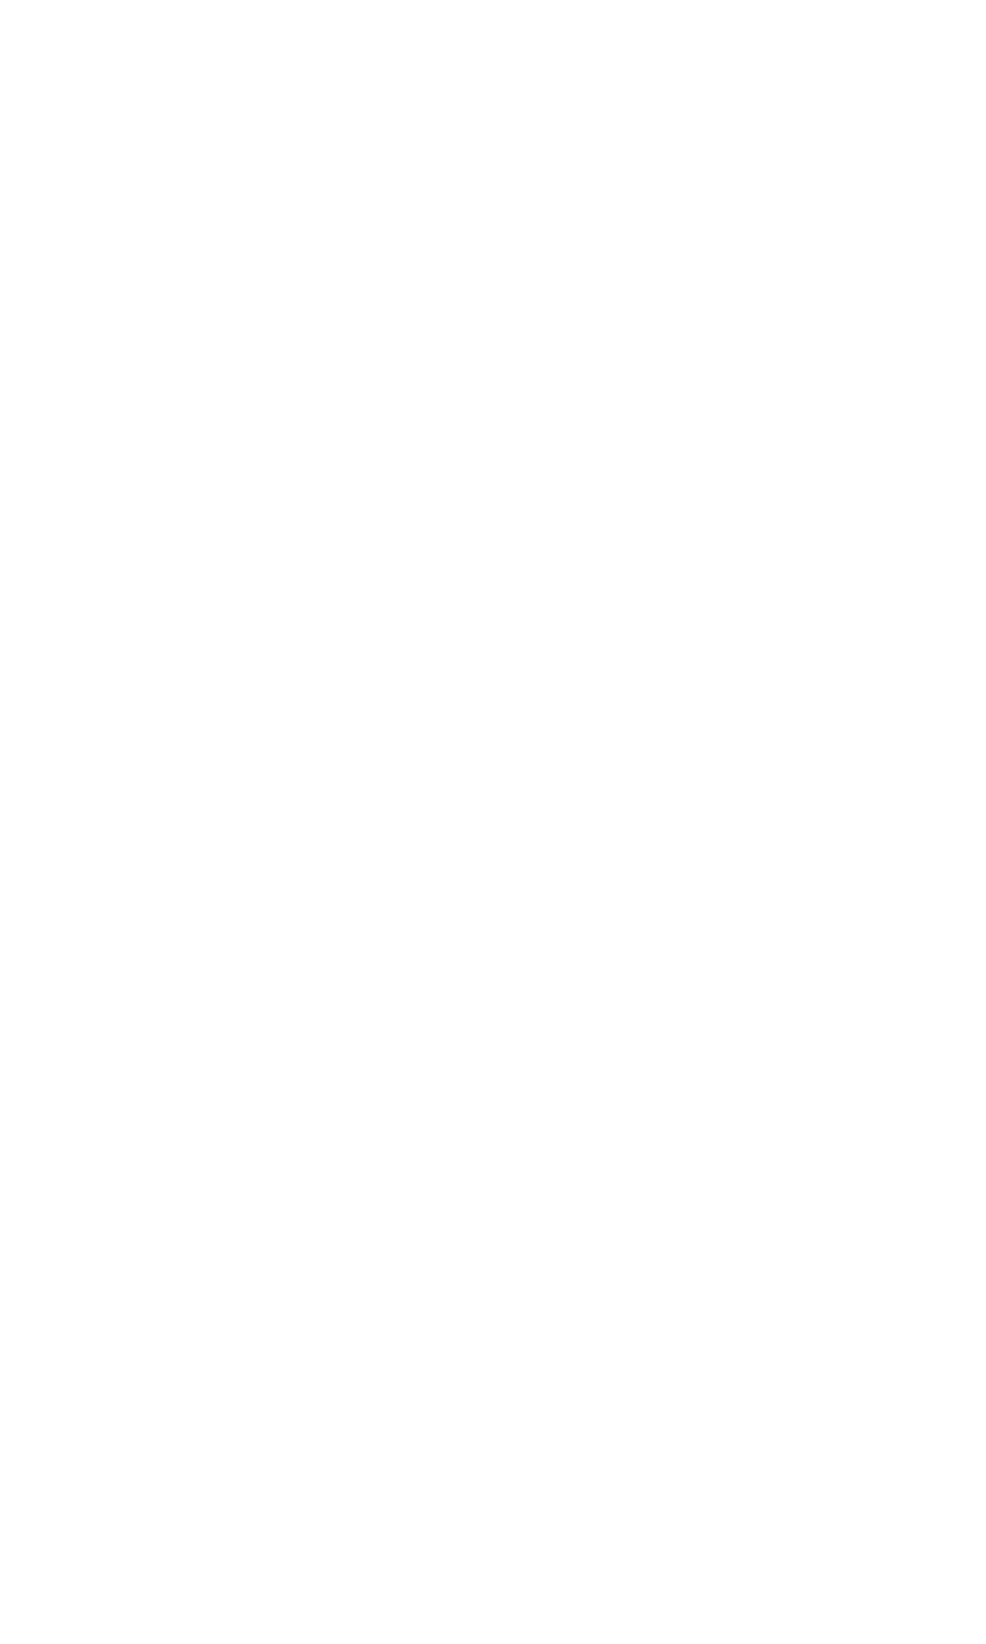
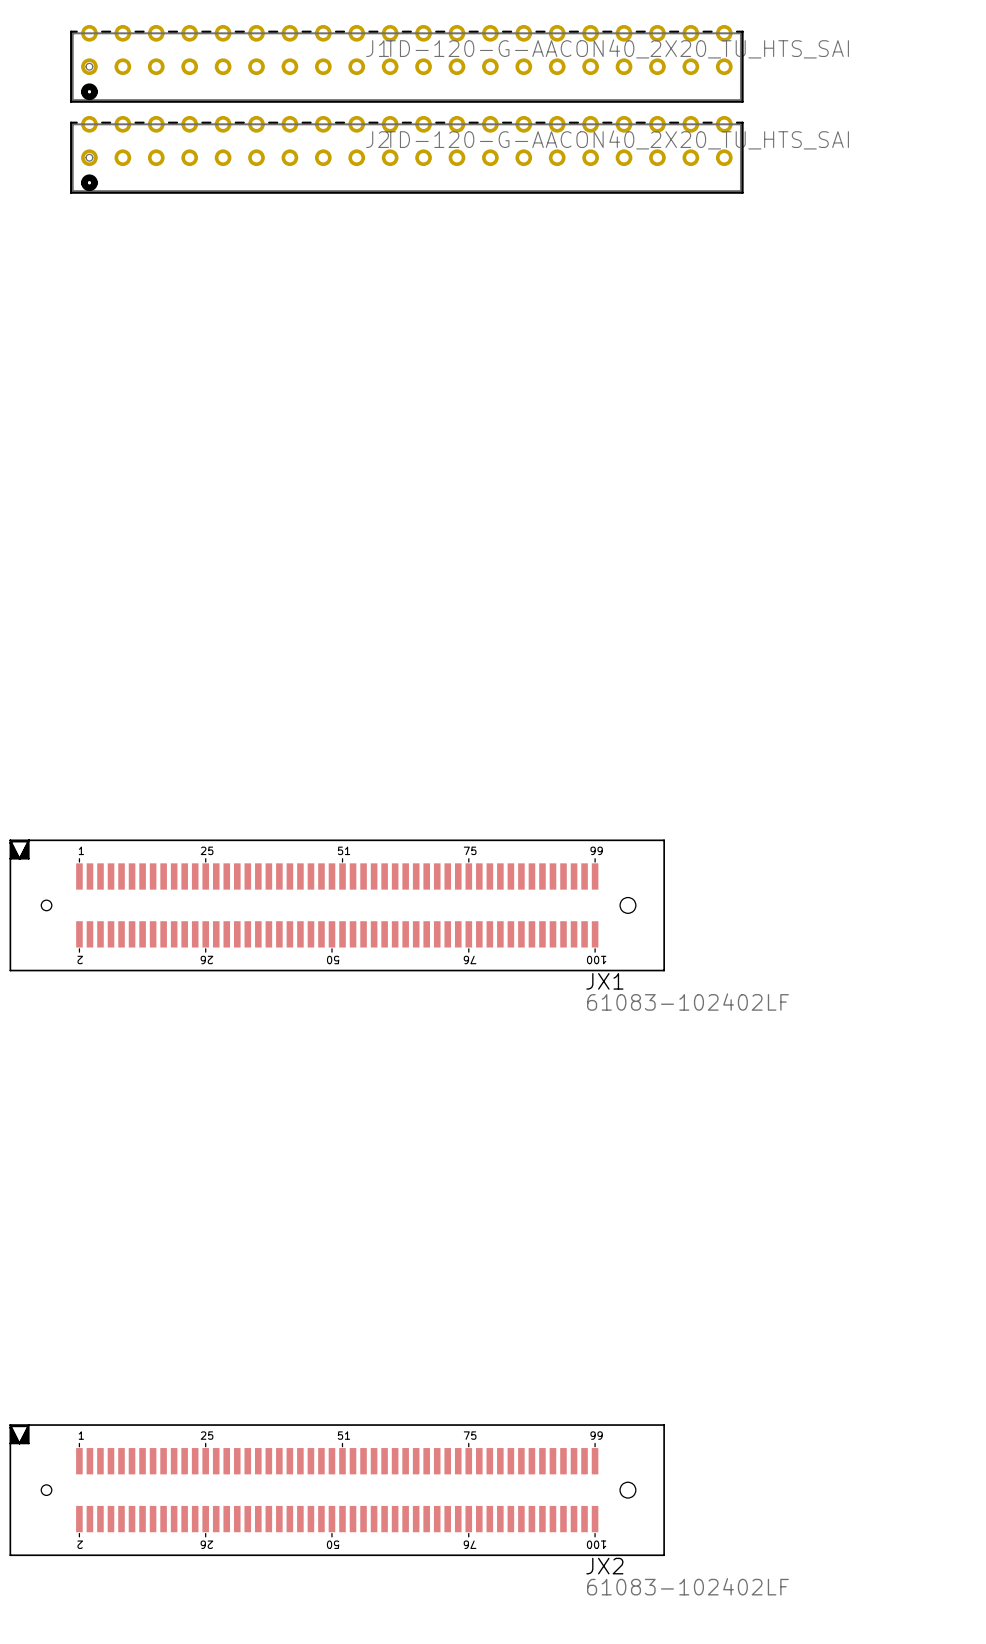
J1: none -> TD-120-G-AACON40_2X20_TU_HTS_SAI (406, 63)
J2: none -> TD-120-G-AACON40_2X20_TU_HTS_SAI (406, 154)
JX1: none -> 61083-102402LF (337, 905)
JX2: none -> 61083-102402LF (337, 1490)

